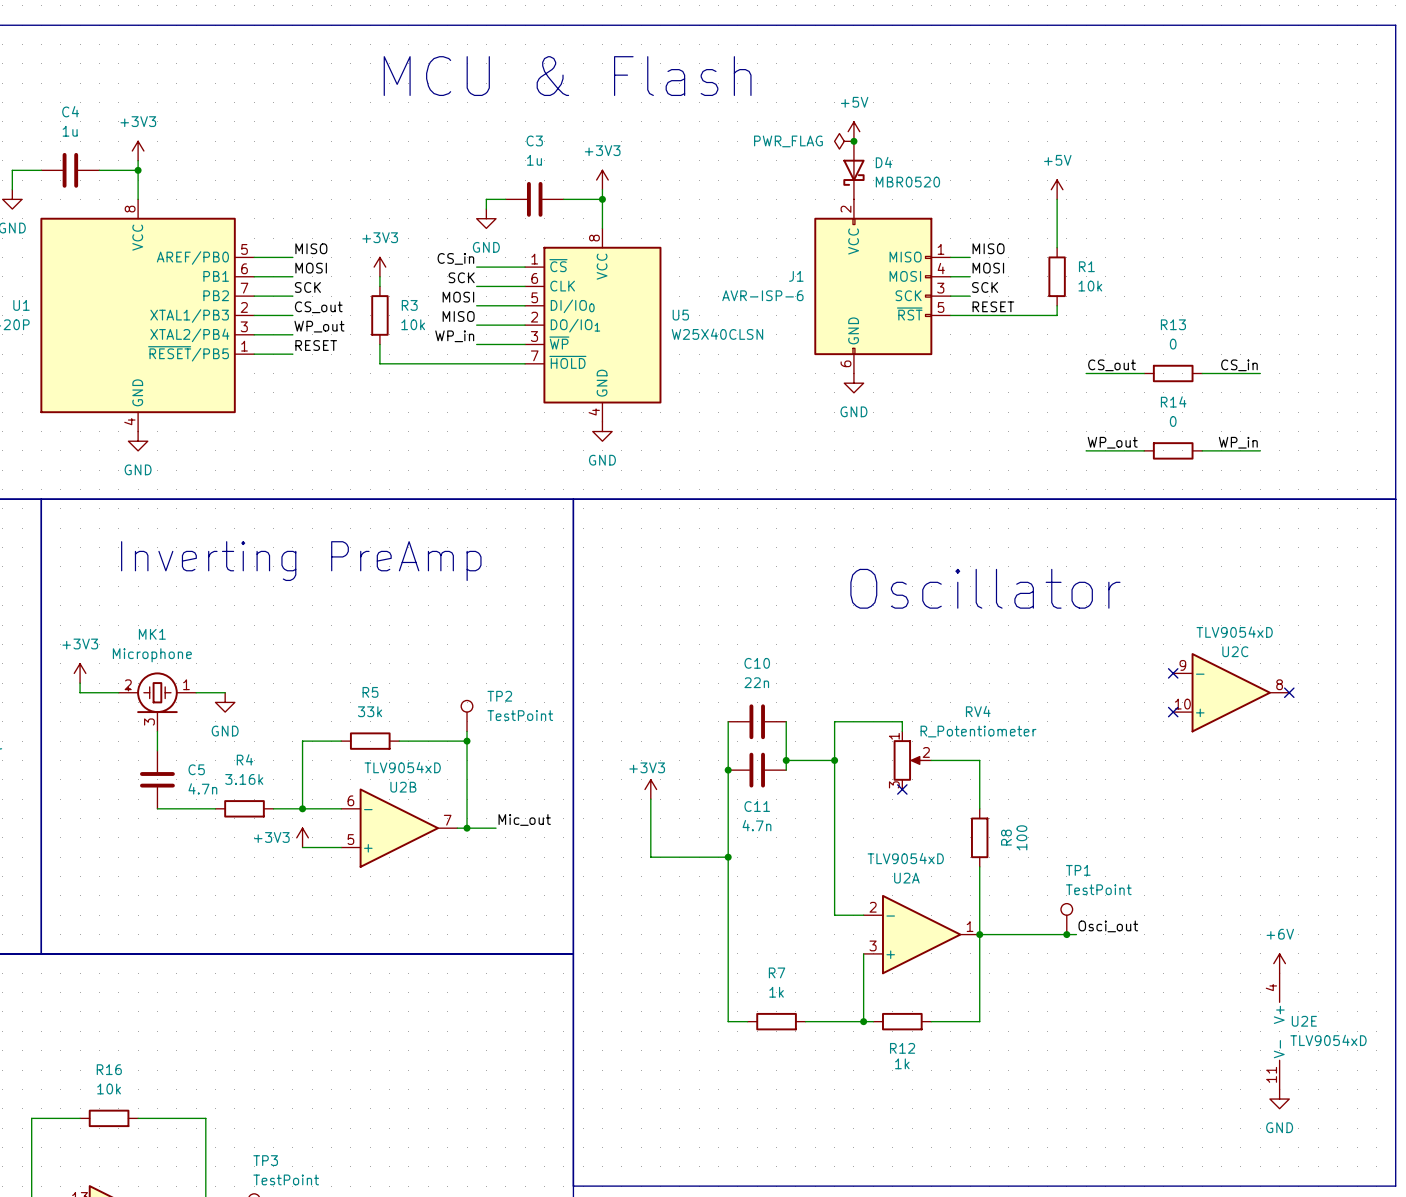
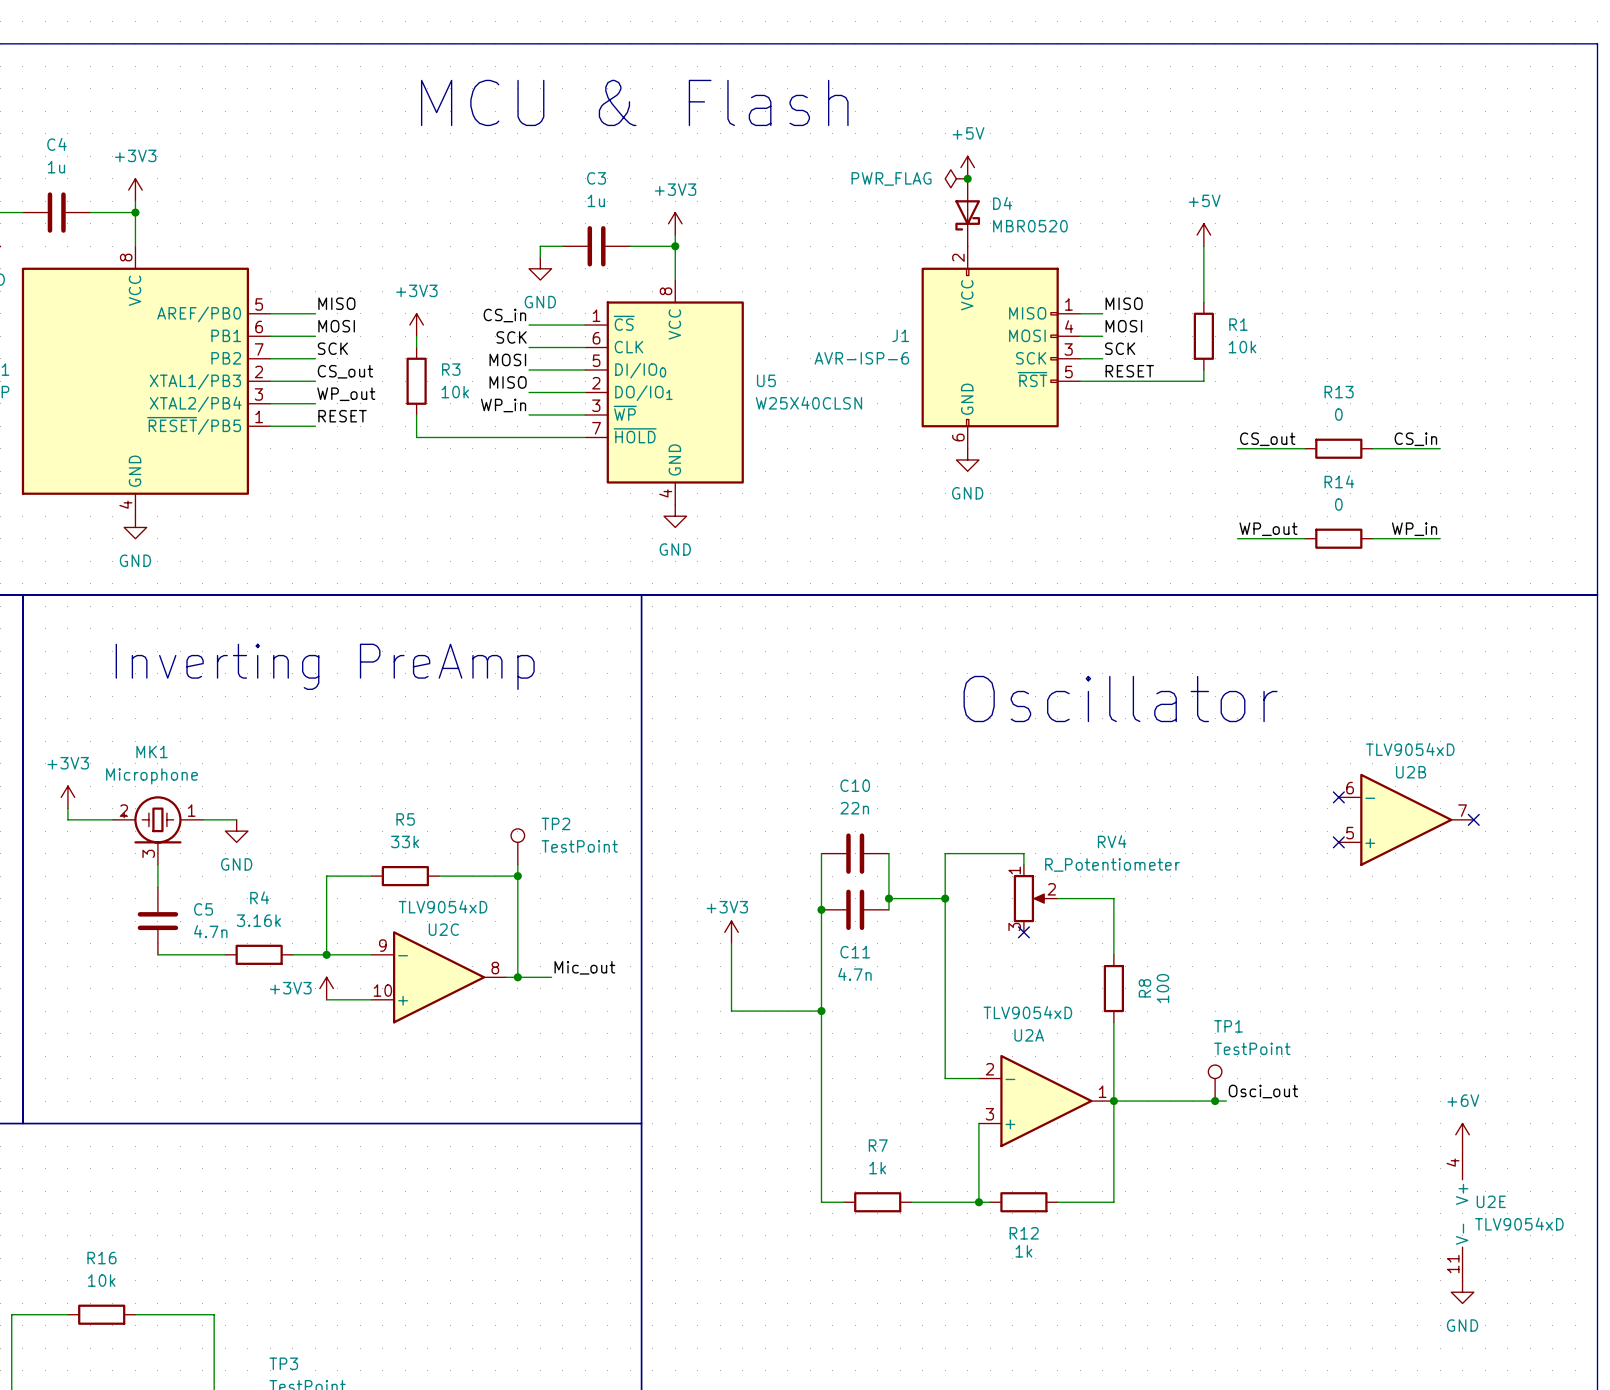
U2C position: (1231, 692) -> (439, 977)
U2B position: (399, 828) -> (1406, 819)

